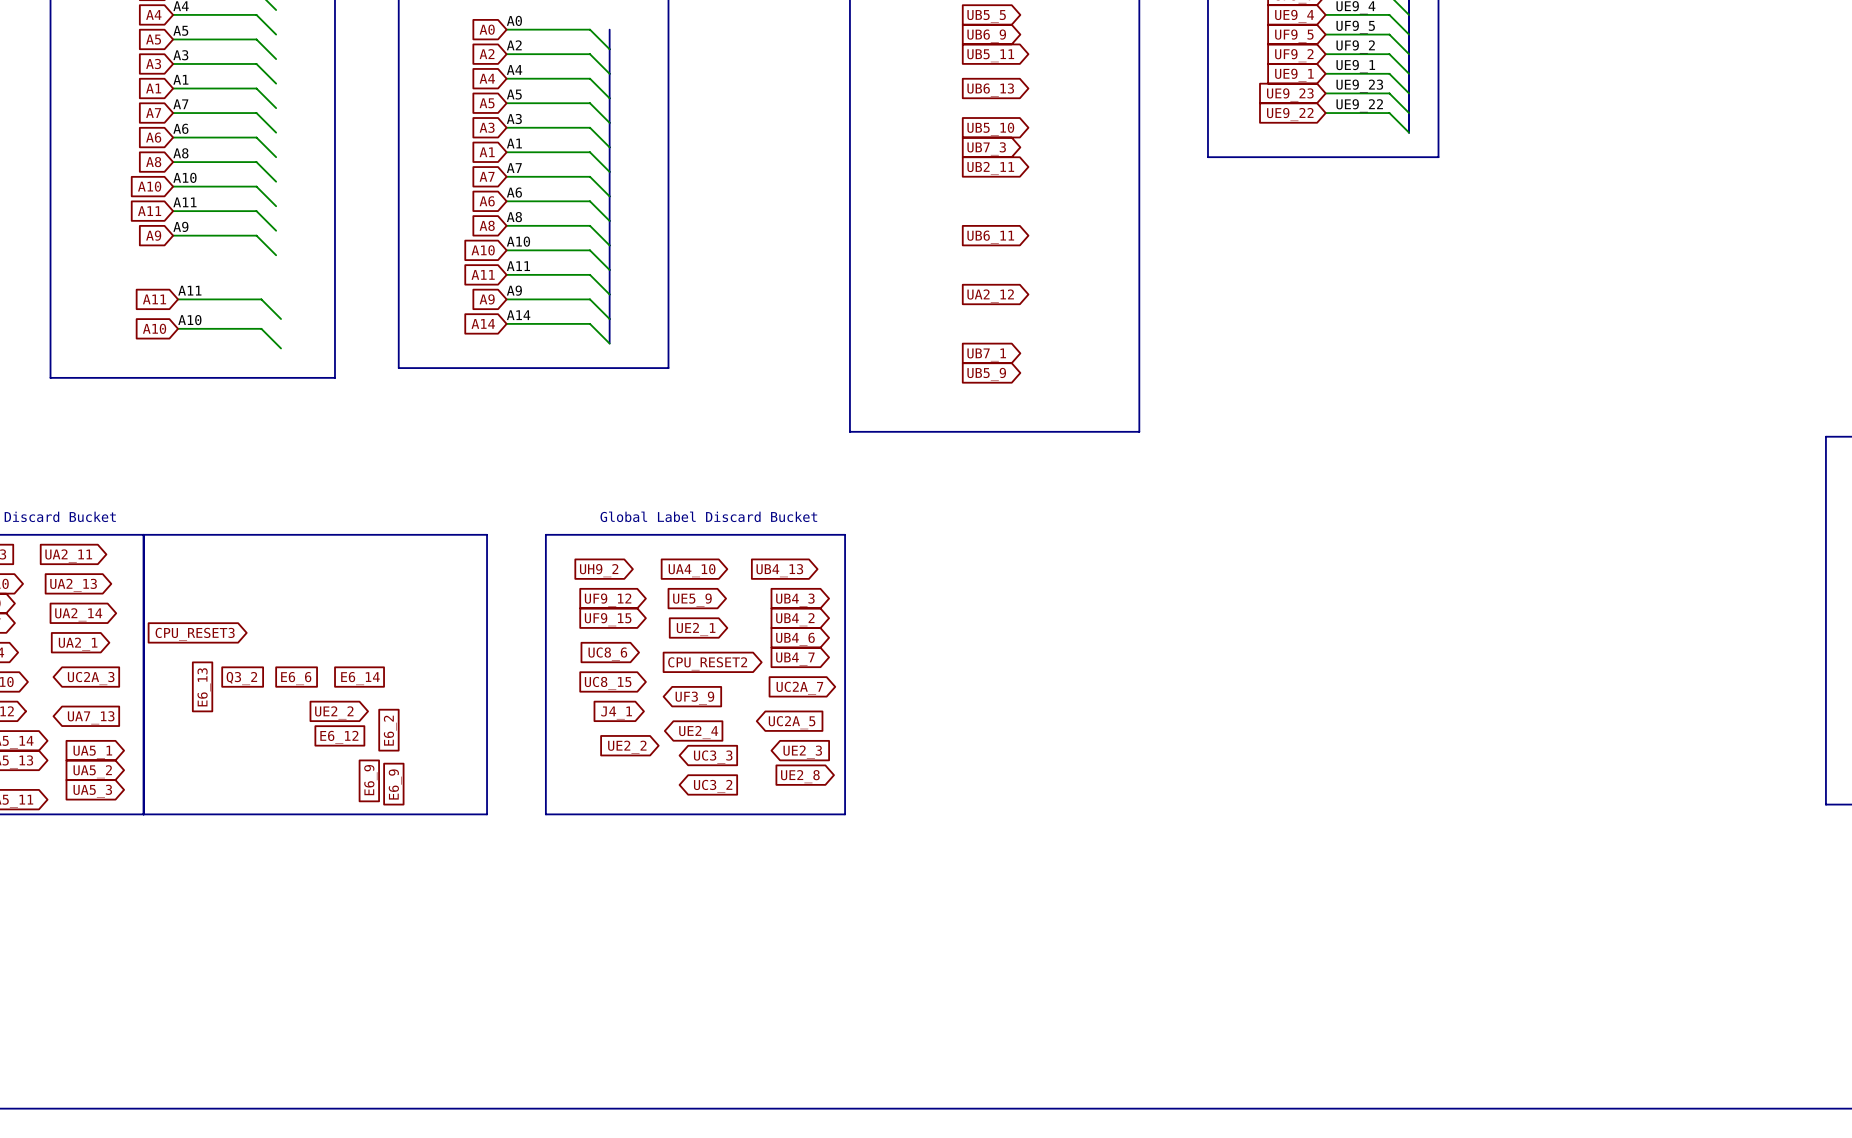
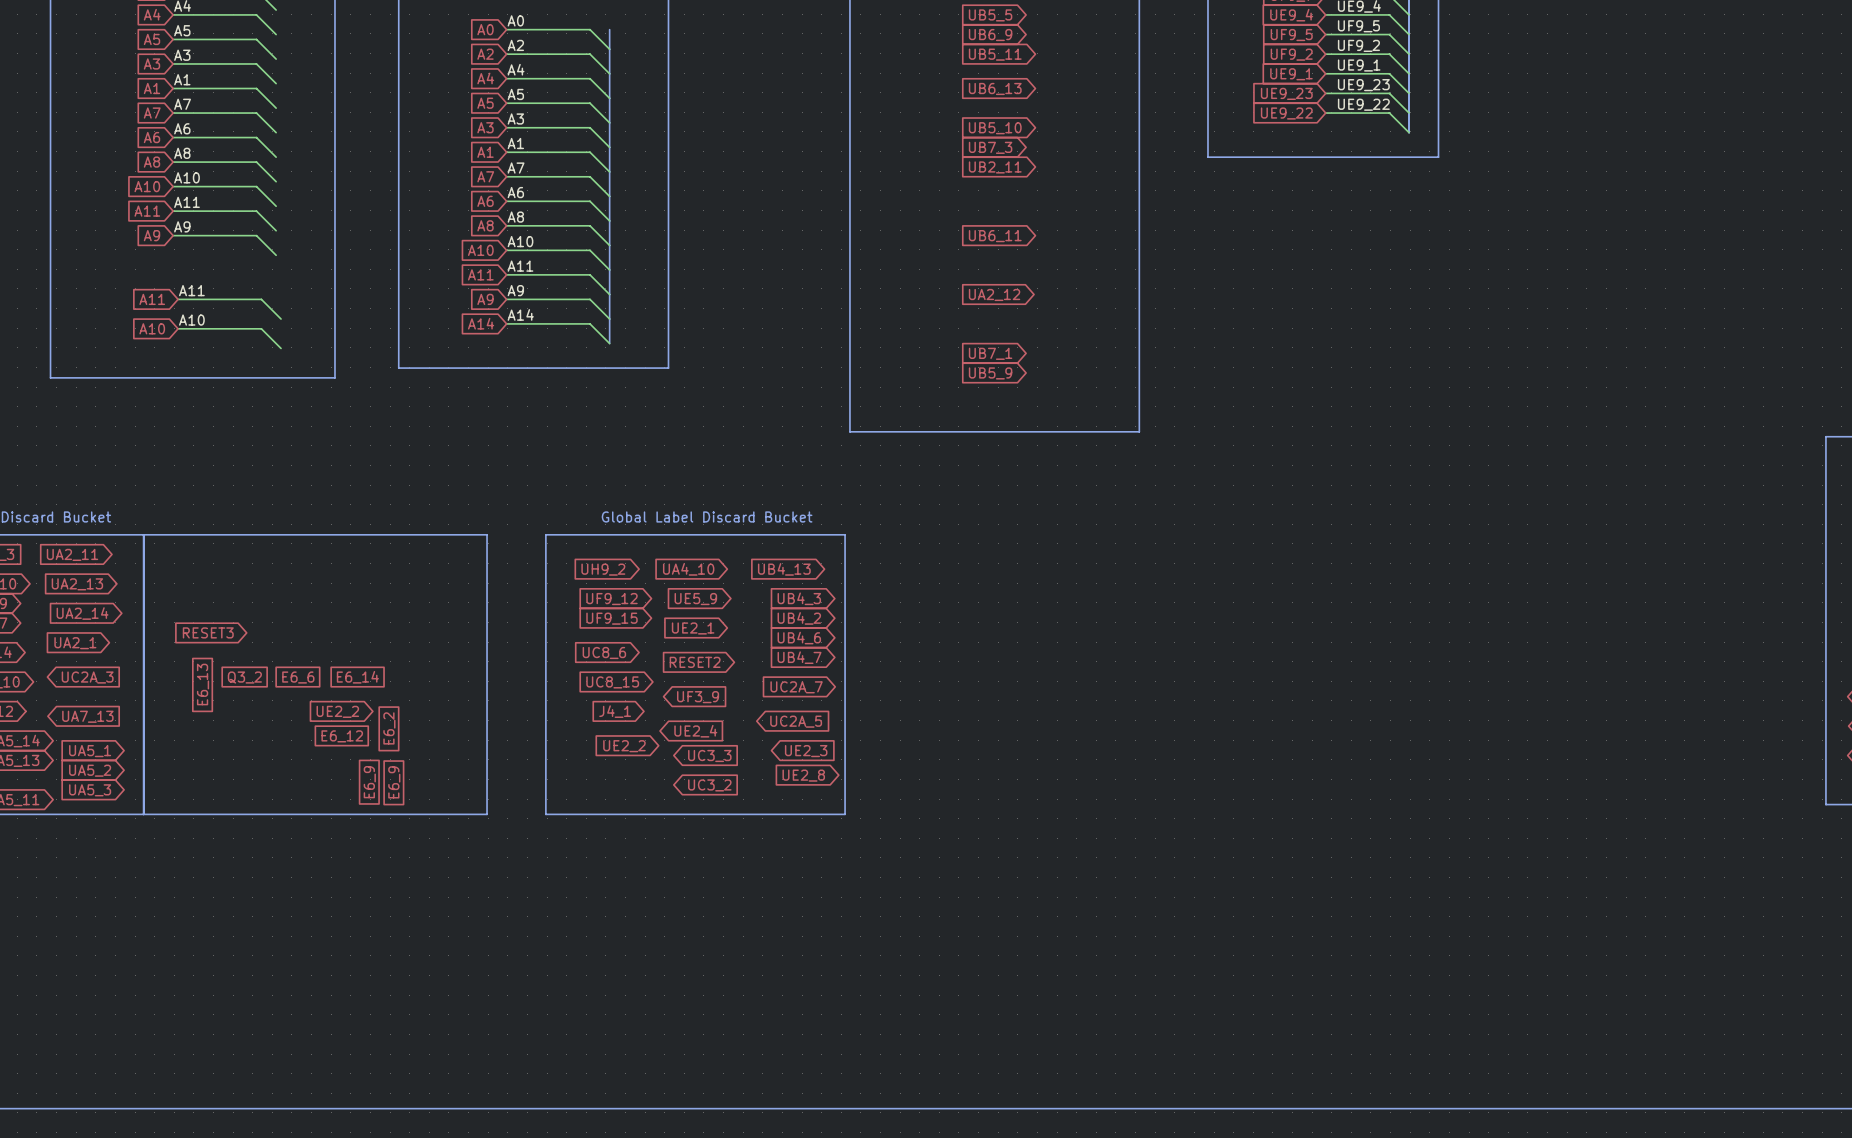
global label: CPU_RESET3 (195, 634) -> RESET3 (208, 632)
global label: CPU_RESET2 (707, 663) -> RESET2 (695, 662)

